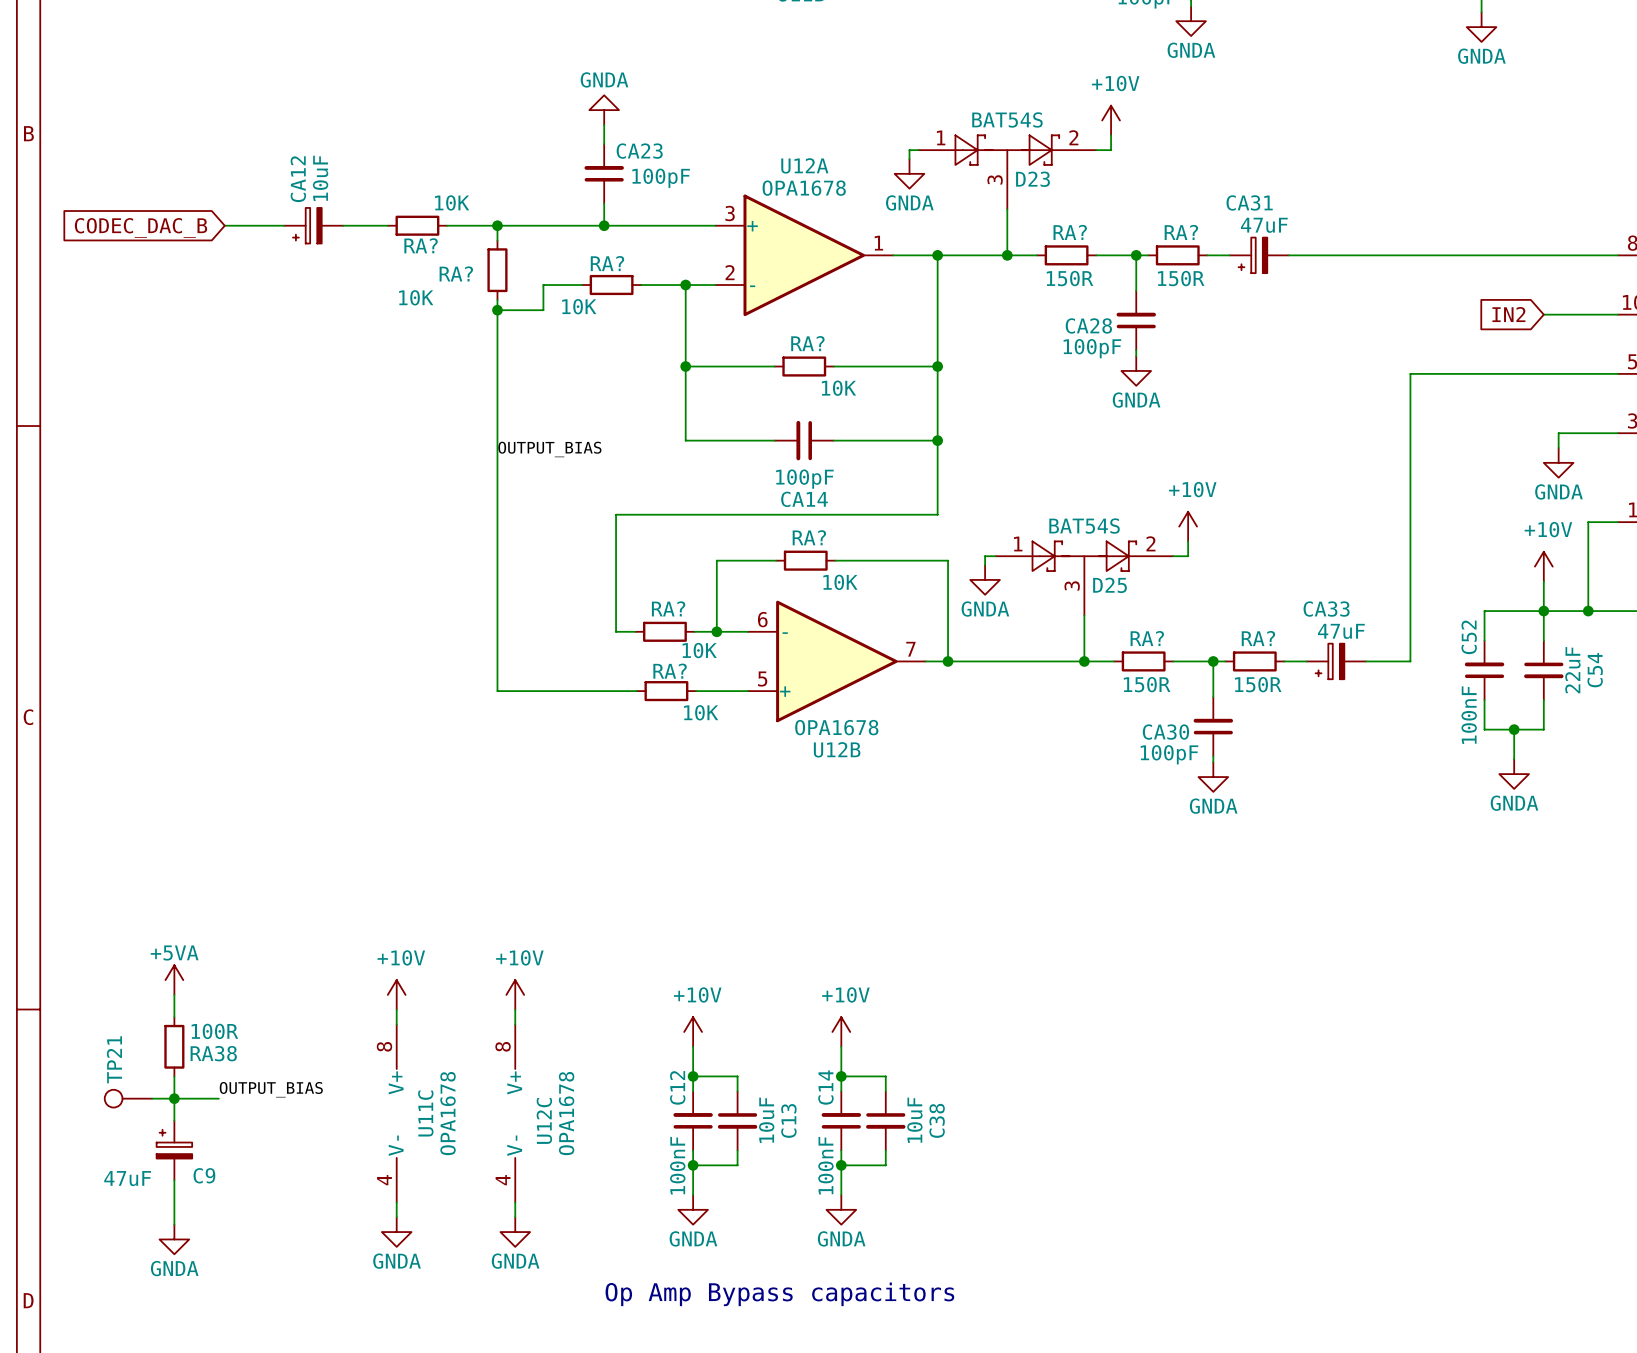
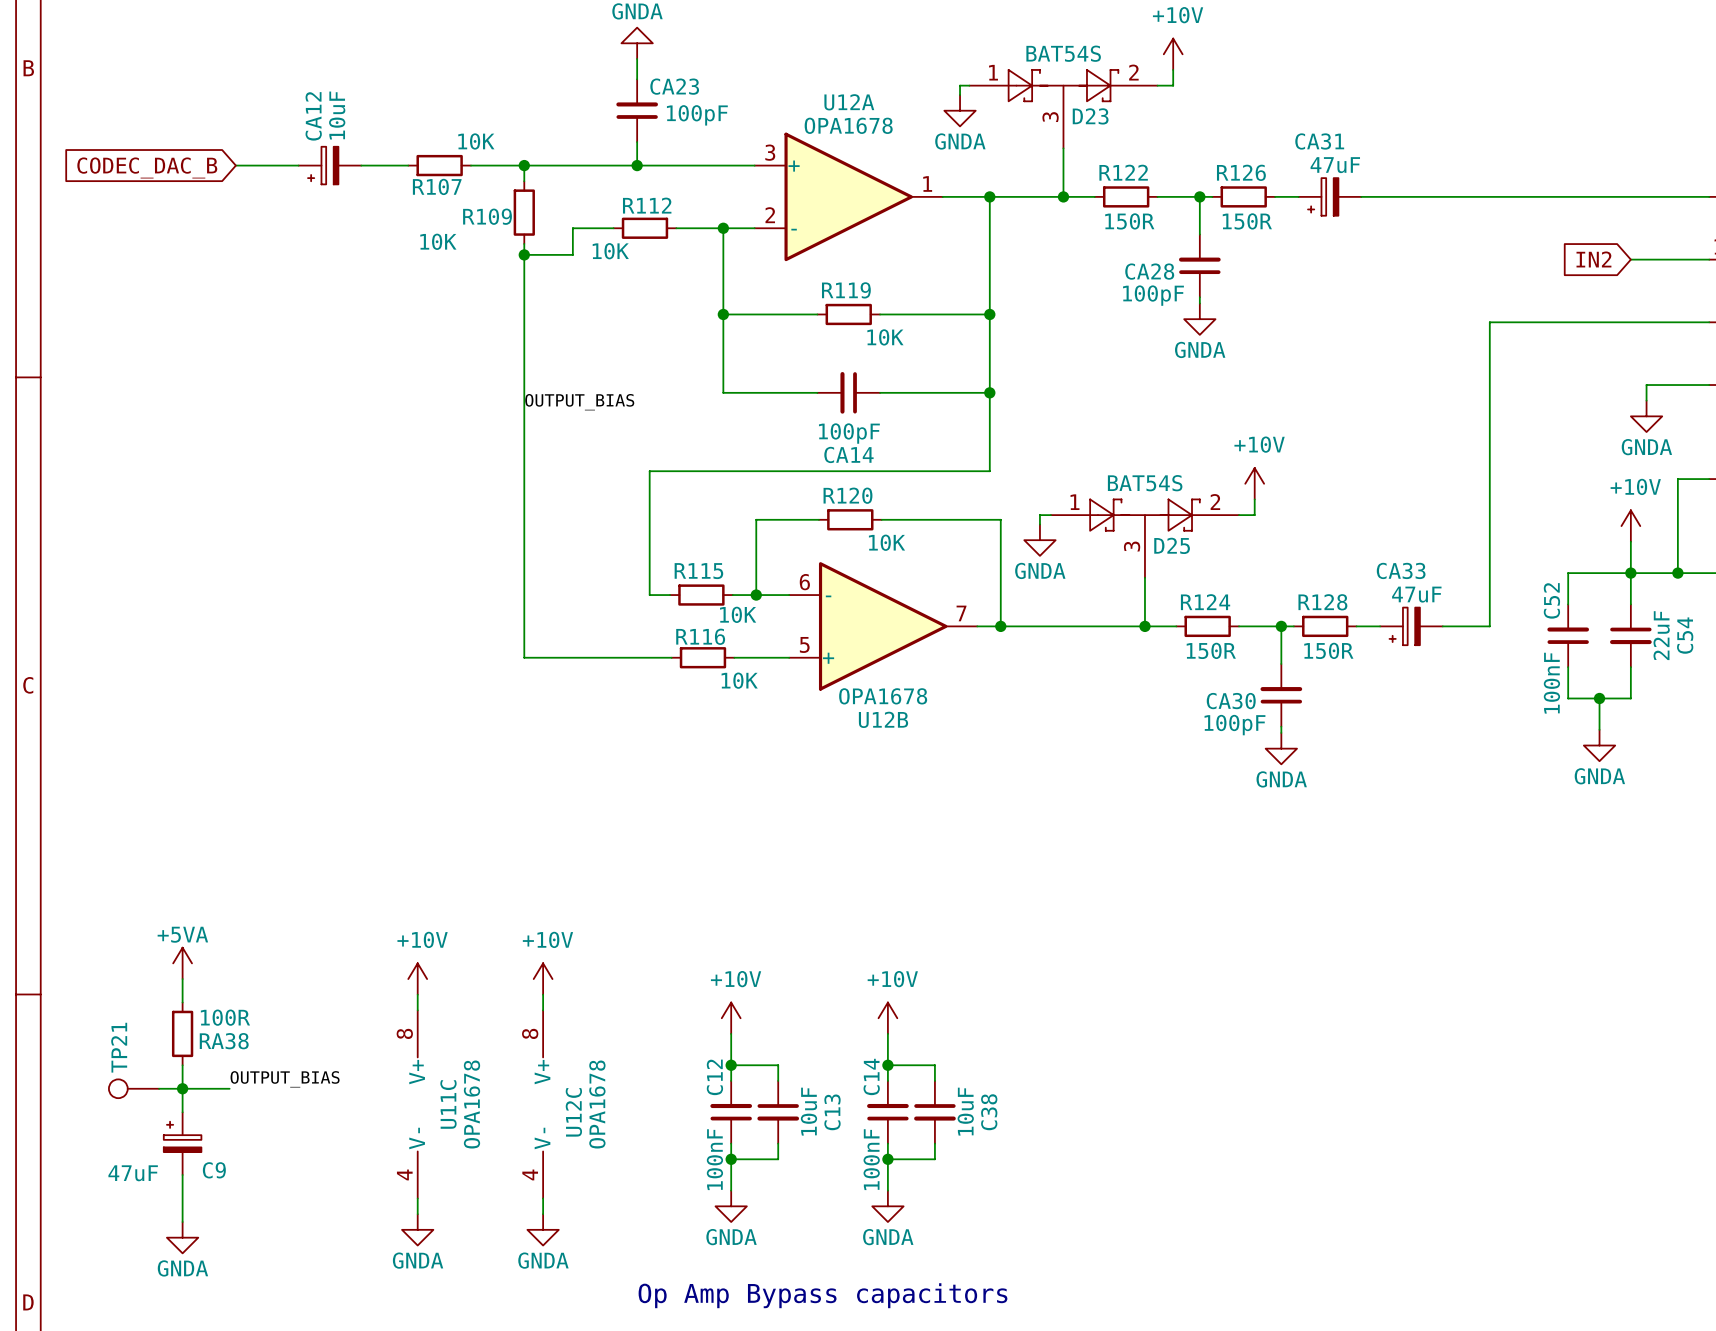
RA? name: RA? (1070, 232) -> R122 (1123, 172)
RA? name: RA? (1181, 232) -> R126 (1241, 172)
RA? name: RA? (421, 245) -> R107 (437, 186)
RA? name: RA? (607, 263) -> R112 (647, 205)
RA? name: RA? (456, 273) -> R109 (487, 216)
RA? name: RA? (807, 343) -> R119 (846, 290)
RA? name: RA? (809, 537) -> R120 (847, 495)
RA? name: RA? (668, 608) -> R115 (698, 571)
RA? name: RA? (1147, 638) -> R124 (1205, 602)
RA? name: RA? (1258, 638) -> R128 (1322, 602)
RA? name: RA? (670, 671) -> R116 (700, 636)

